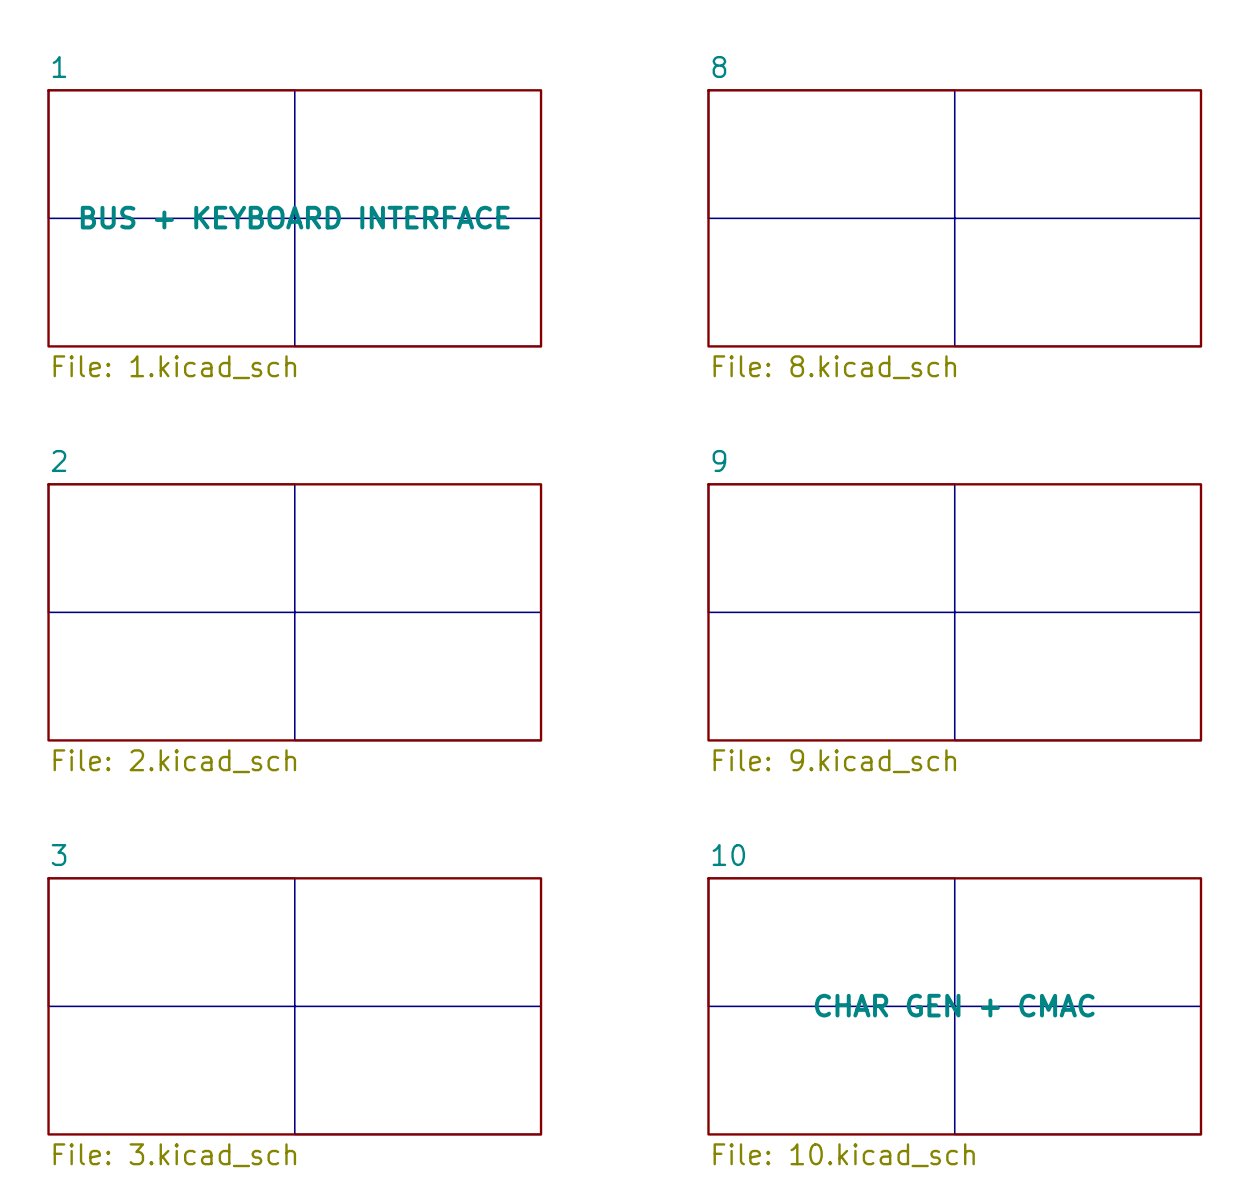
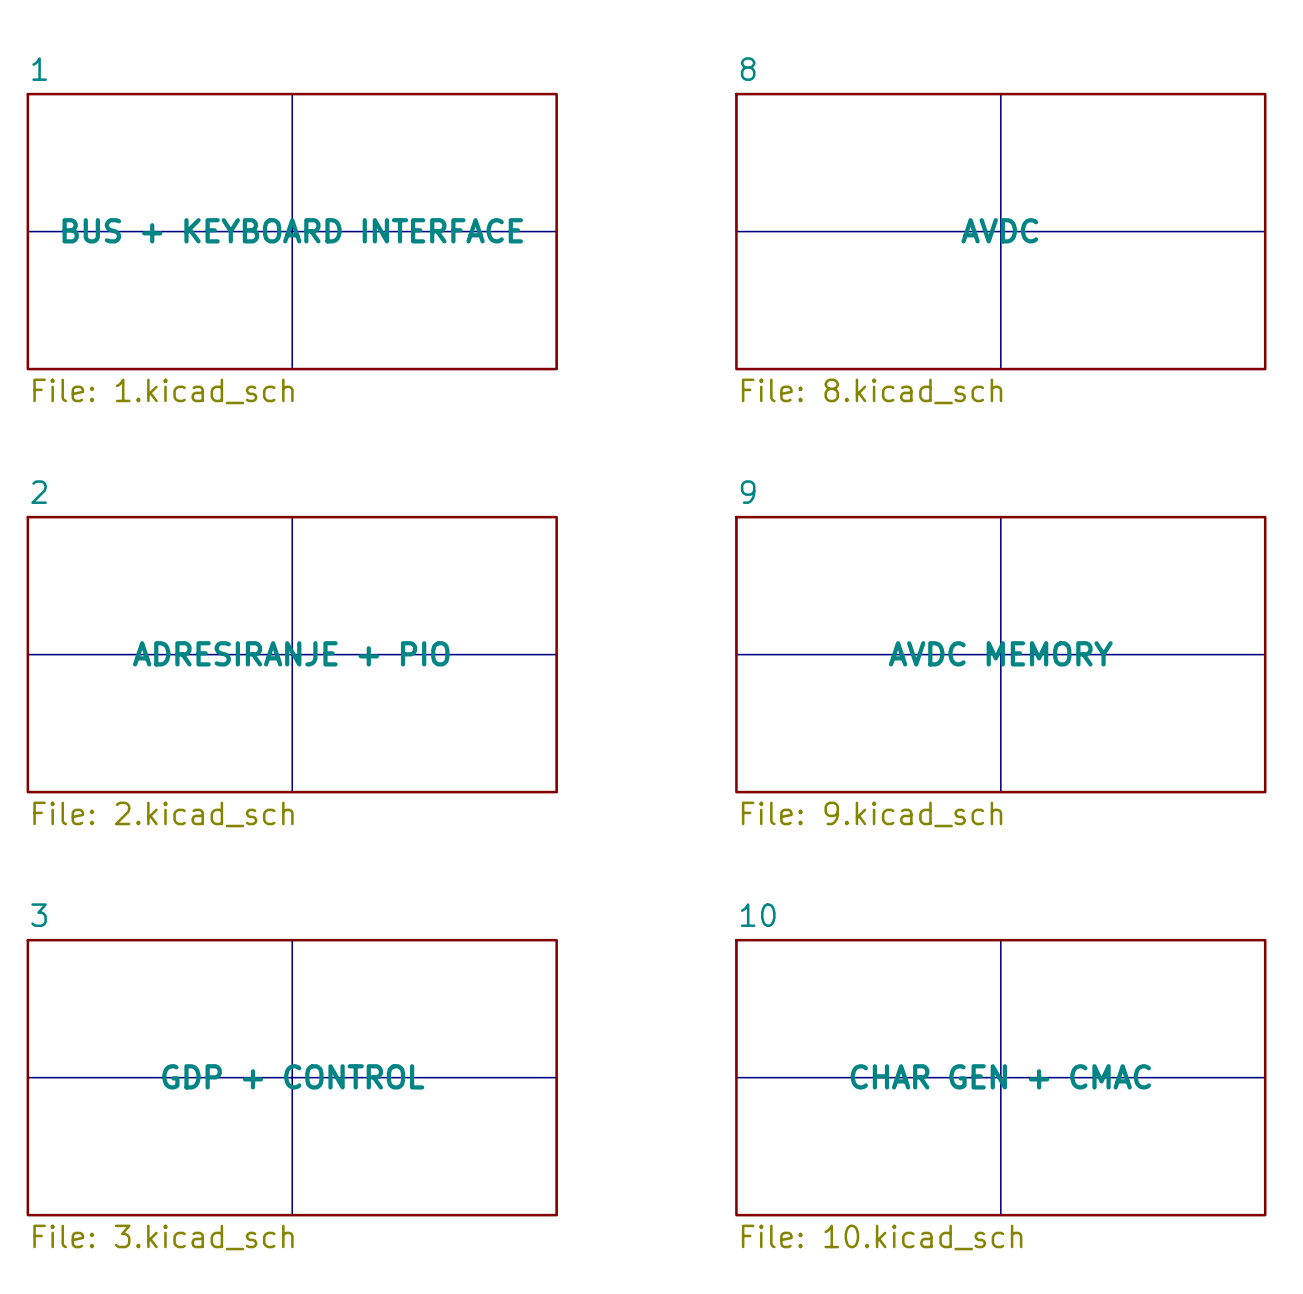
sheet 8 text: none -> AVDC (999, 230)
sheet 2 text: none -> ADRESIRANJE + PIO (291, 653)
sheet 9 text: none -> AVDC MEMORY (1000, 653)
sheet 3 text: none -> GDP + CONTROL (293, 1076)

